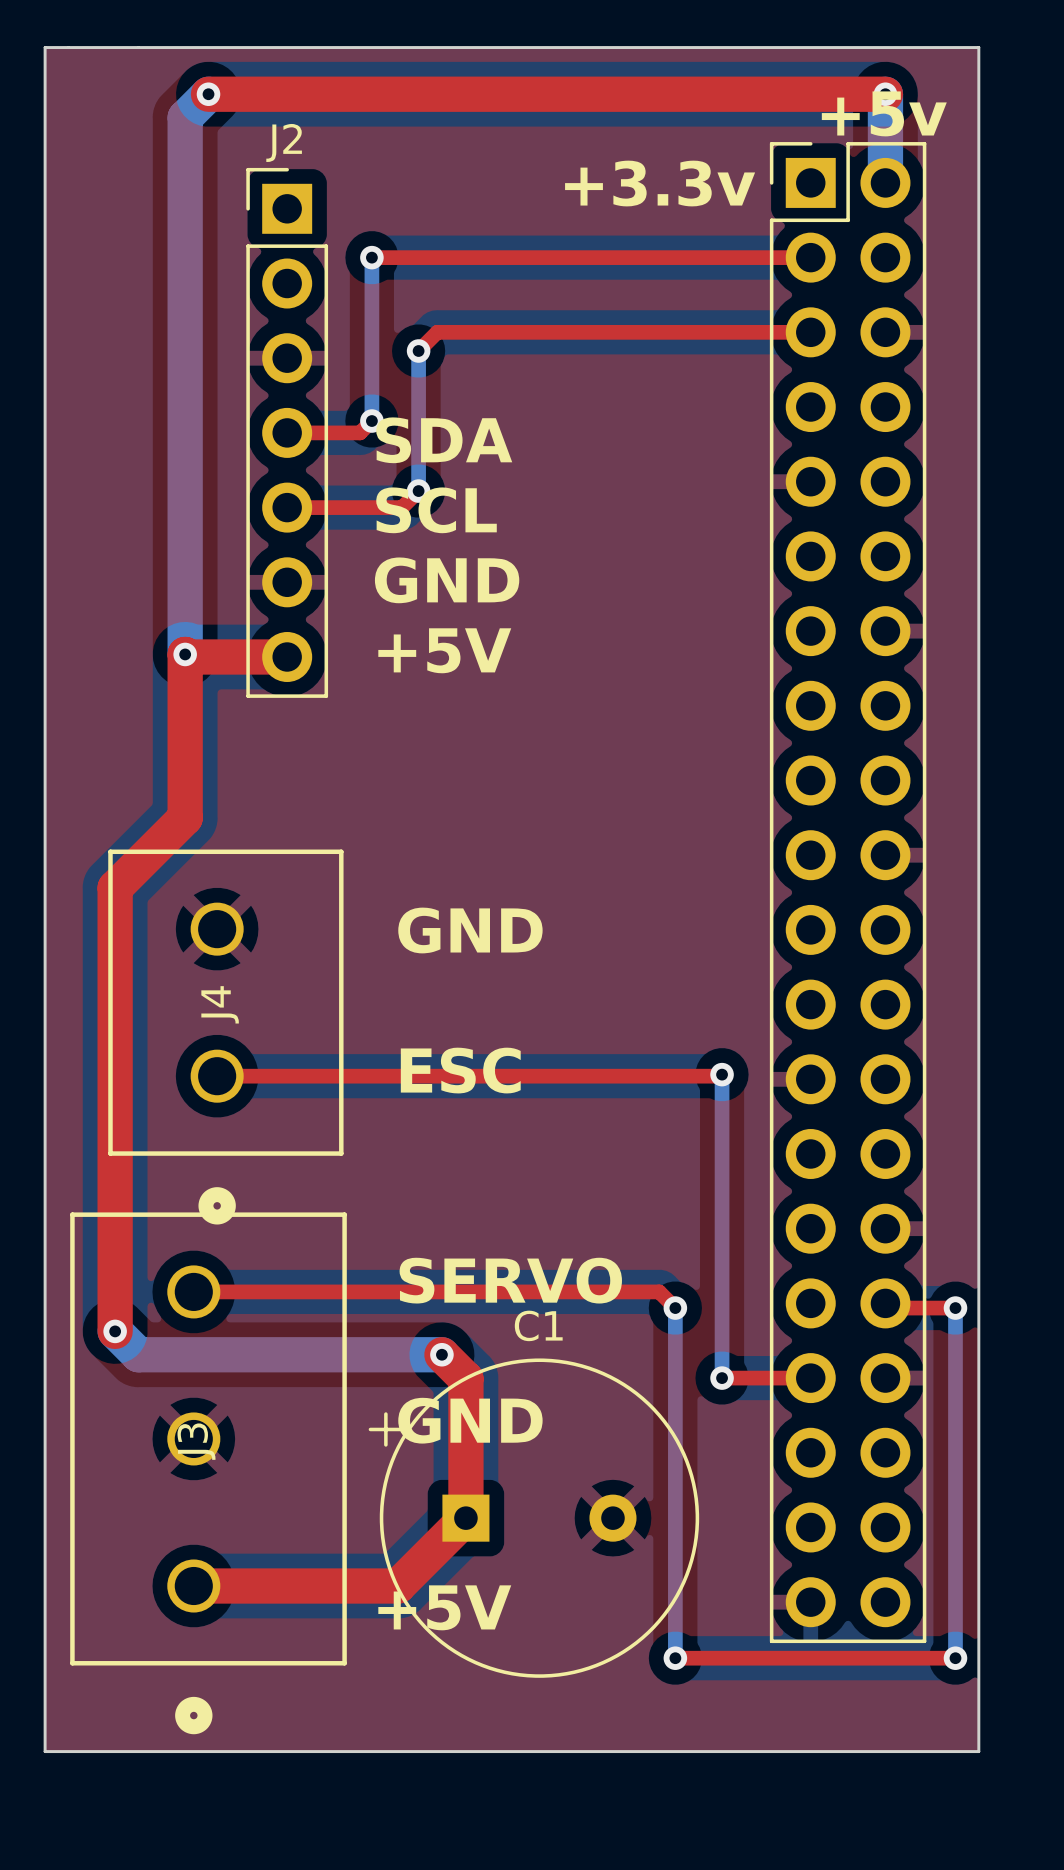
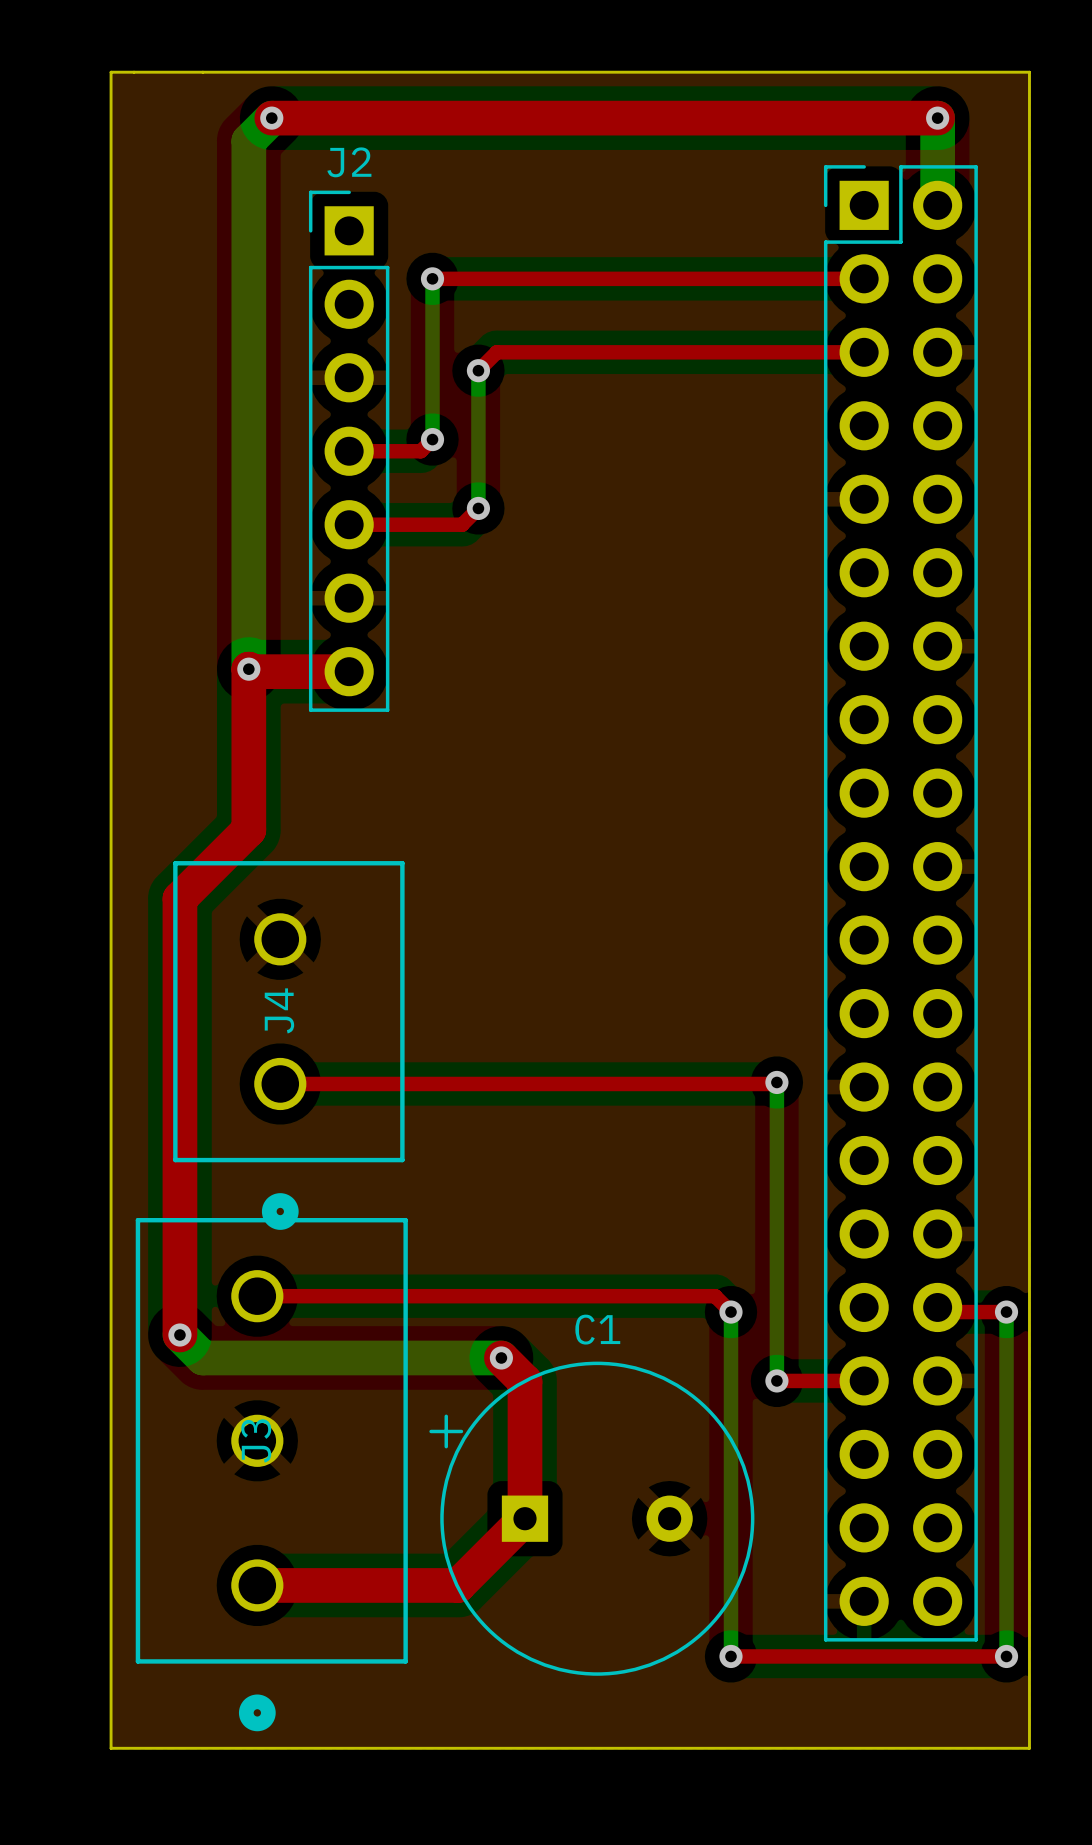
text: +5v (884, 113) -> none
text: +3.3v (660, 183) -> none
text: SDA (444, 440) -> none
text: SCL (436, 510) -> none
text: GND (447, 580) -> none
text: +5V (444, 650) -> none
text: GND (470, 930) -> none
text: ESC (460, 1070) -> none
text: SERVO (510, 1280) -> none
text: GND (470, 1420) -> none
text: +5V (444, 1607) -> none

